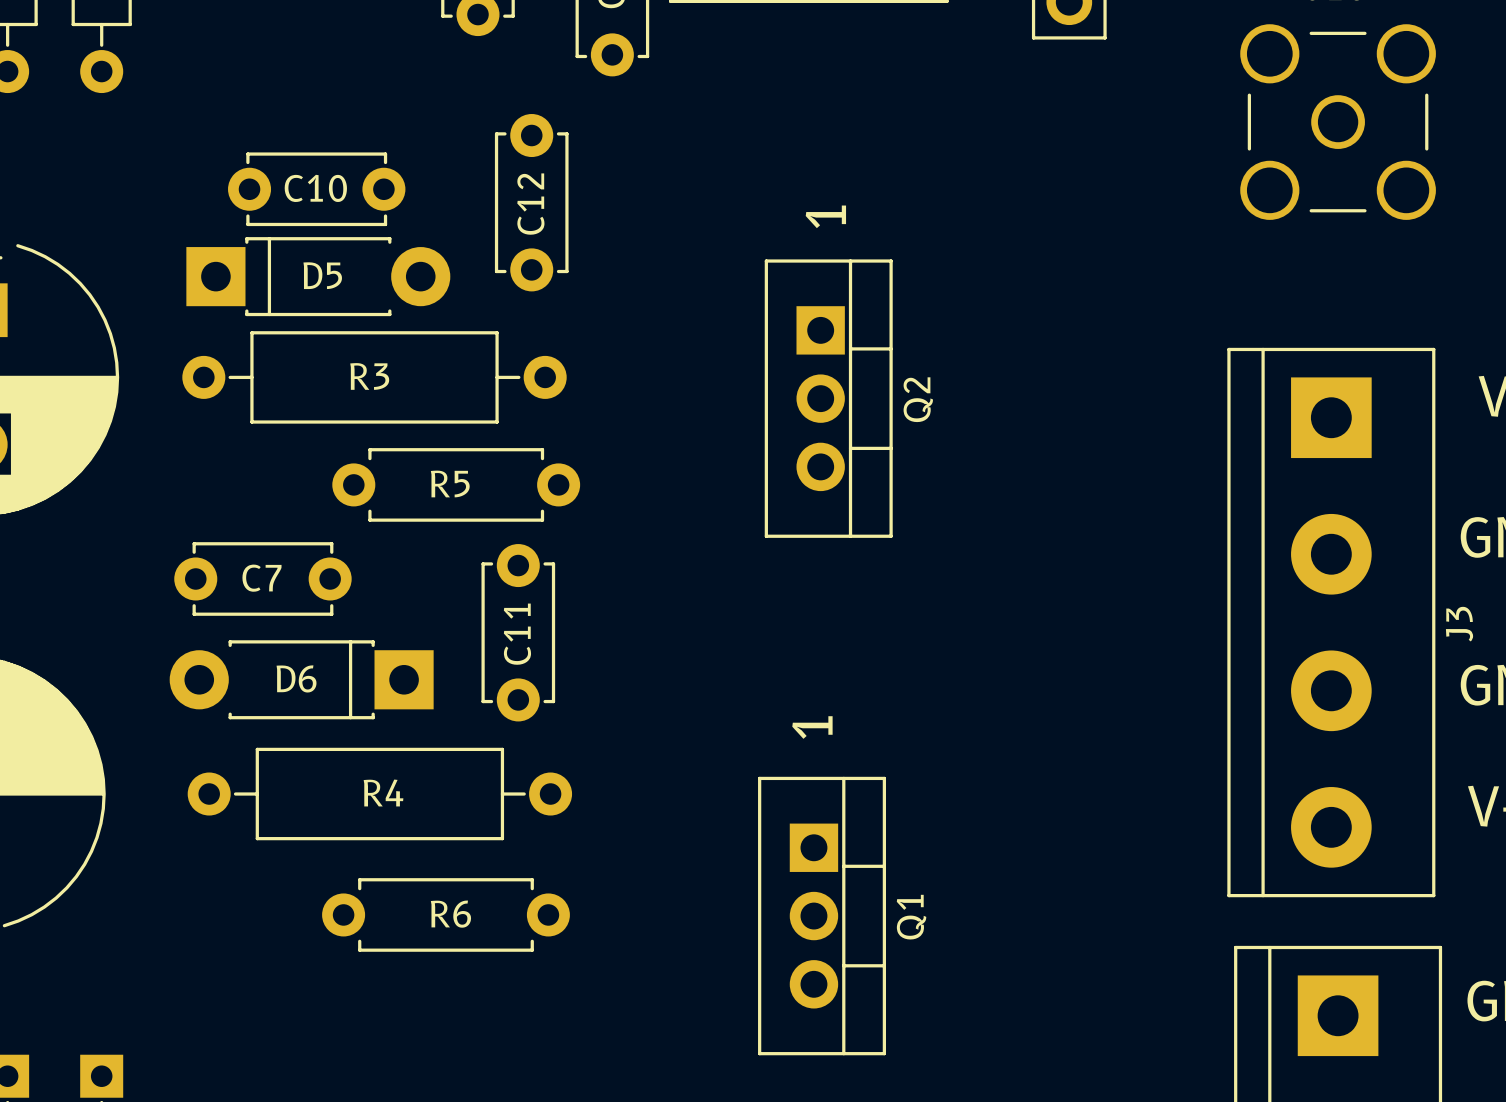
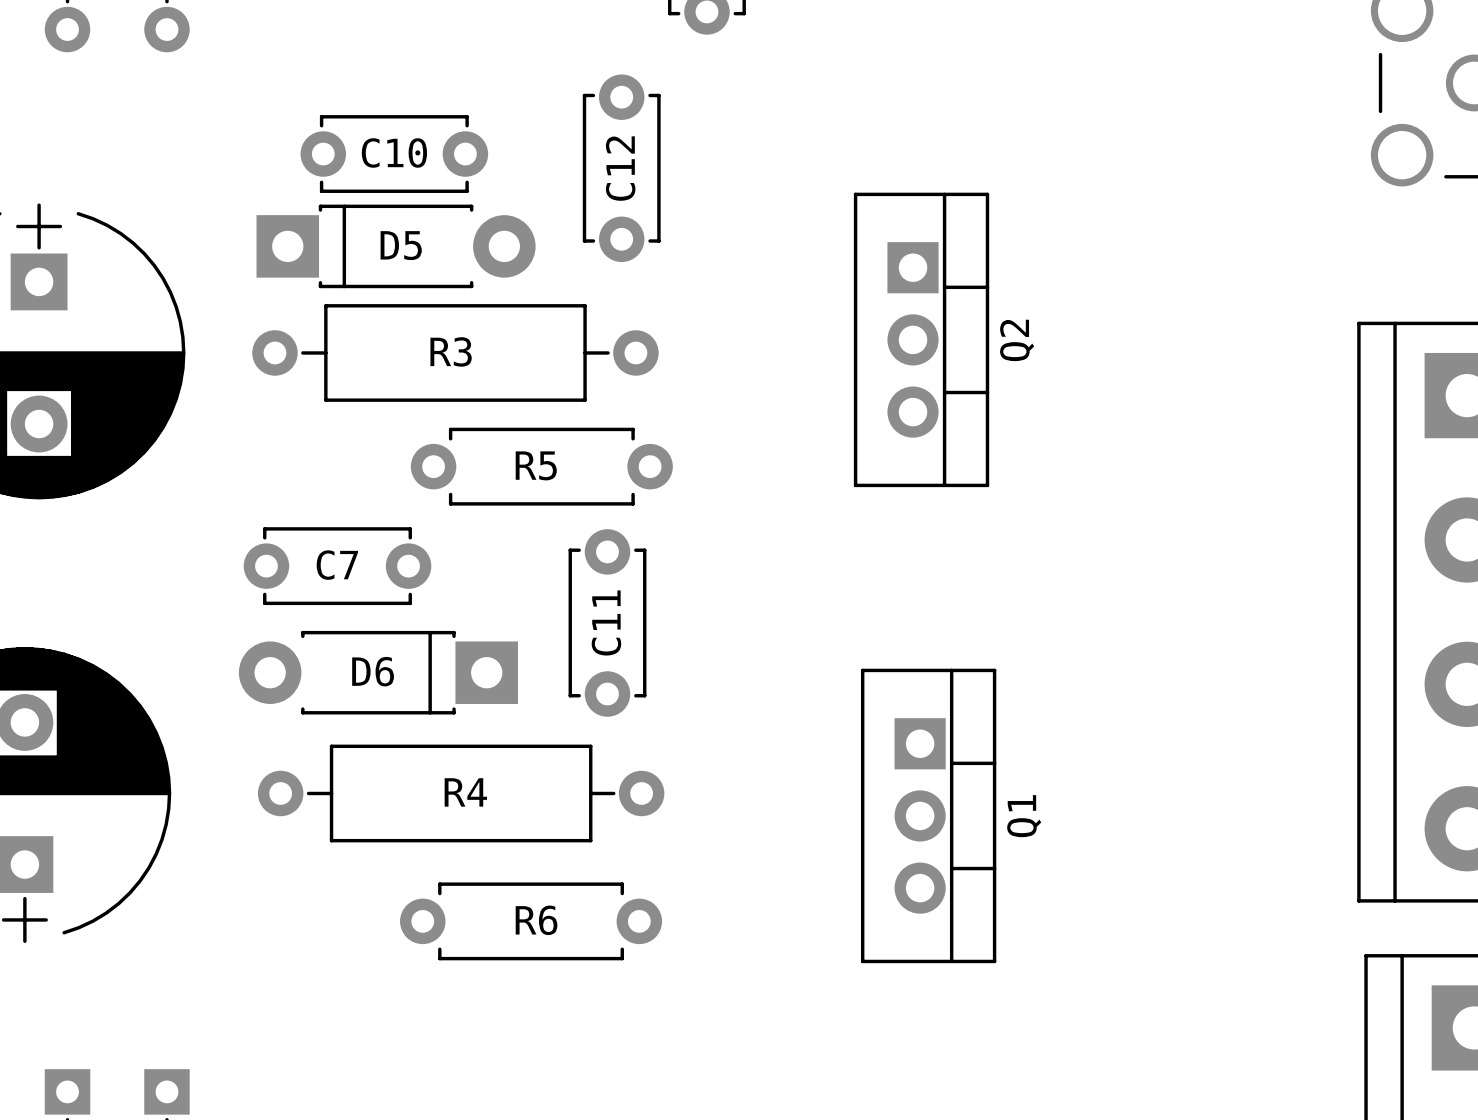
text: 1 (825, 216) -> none
Q2 position: (828, 398) -> (921, 339)
text: 1 (812, 727) -> none
Q1 position: (822, 916) -> (928, 815)

